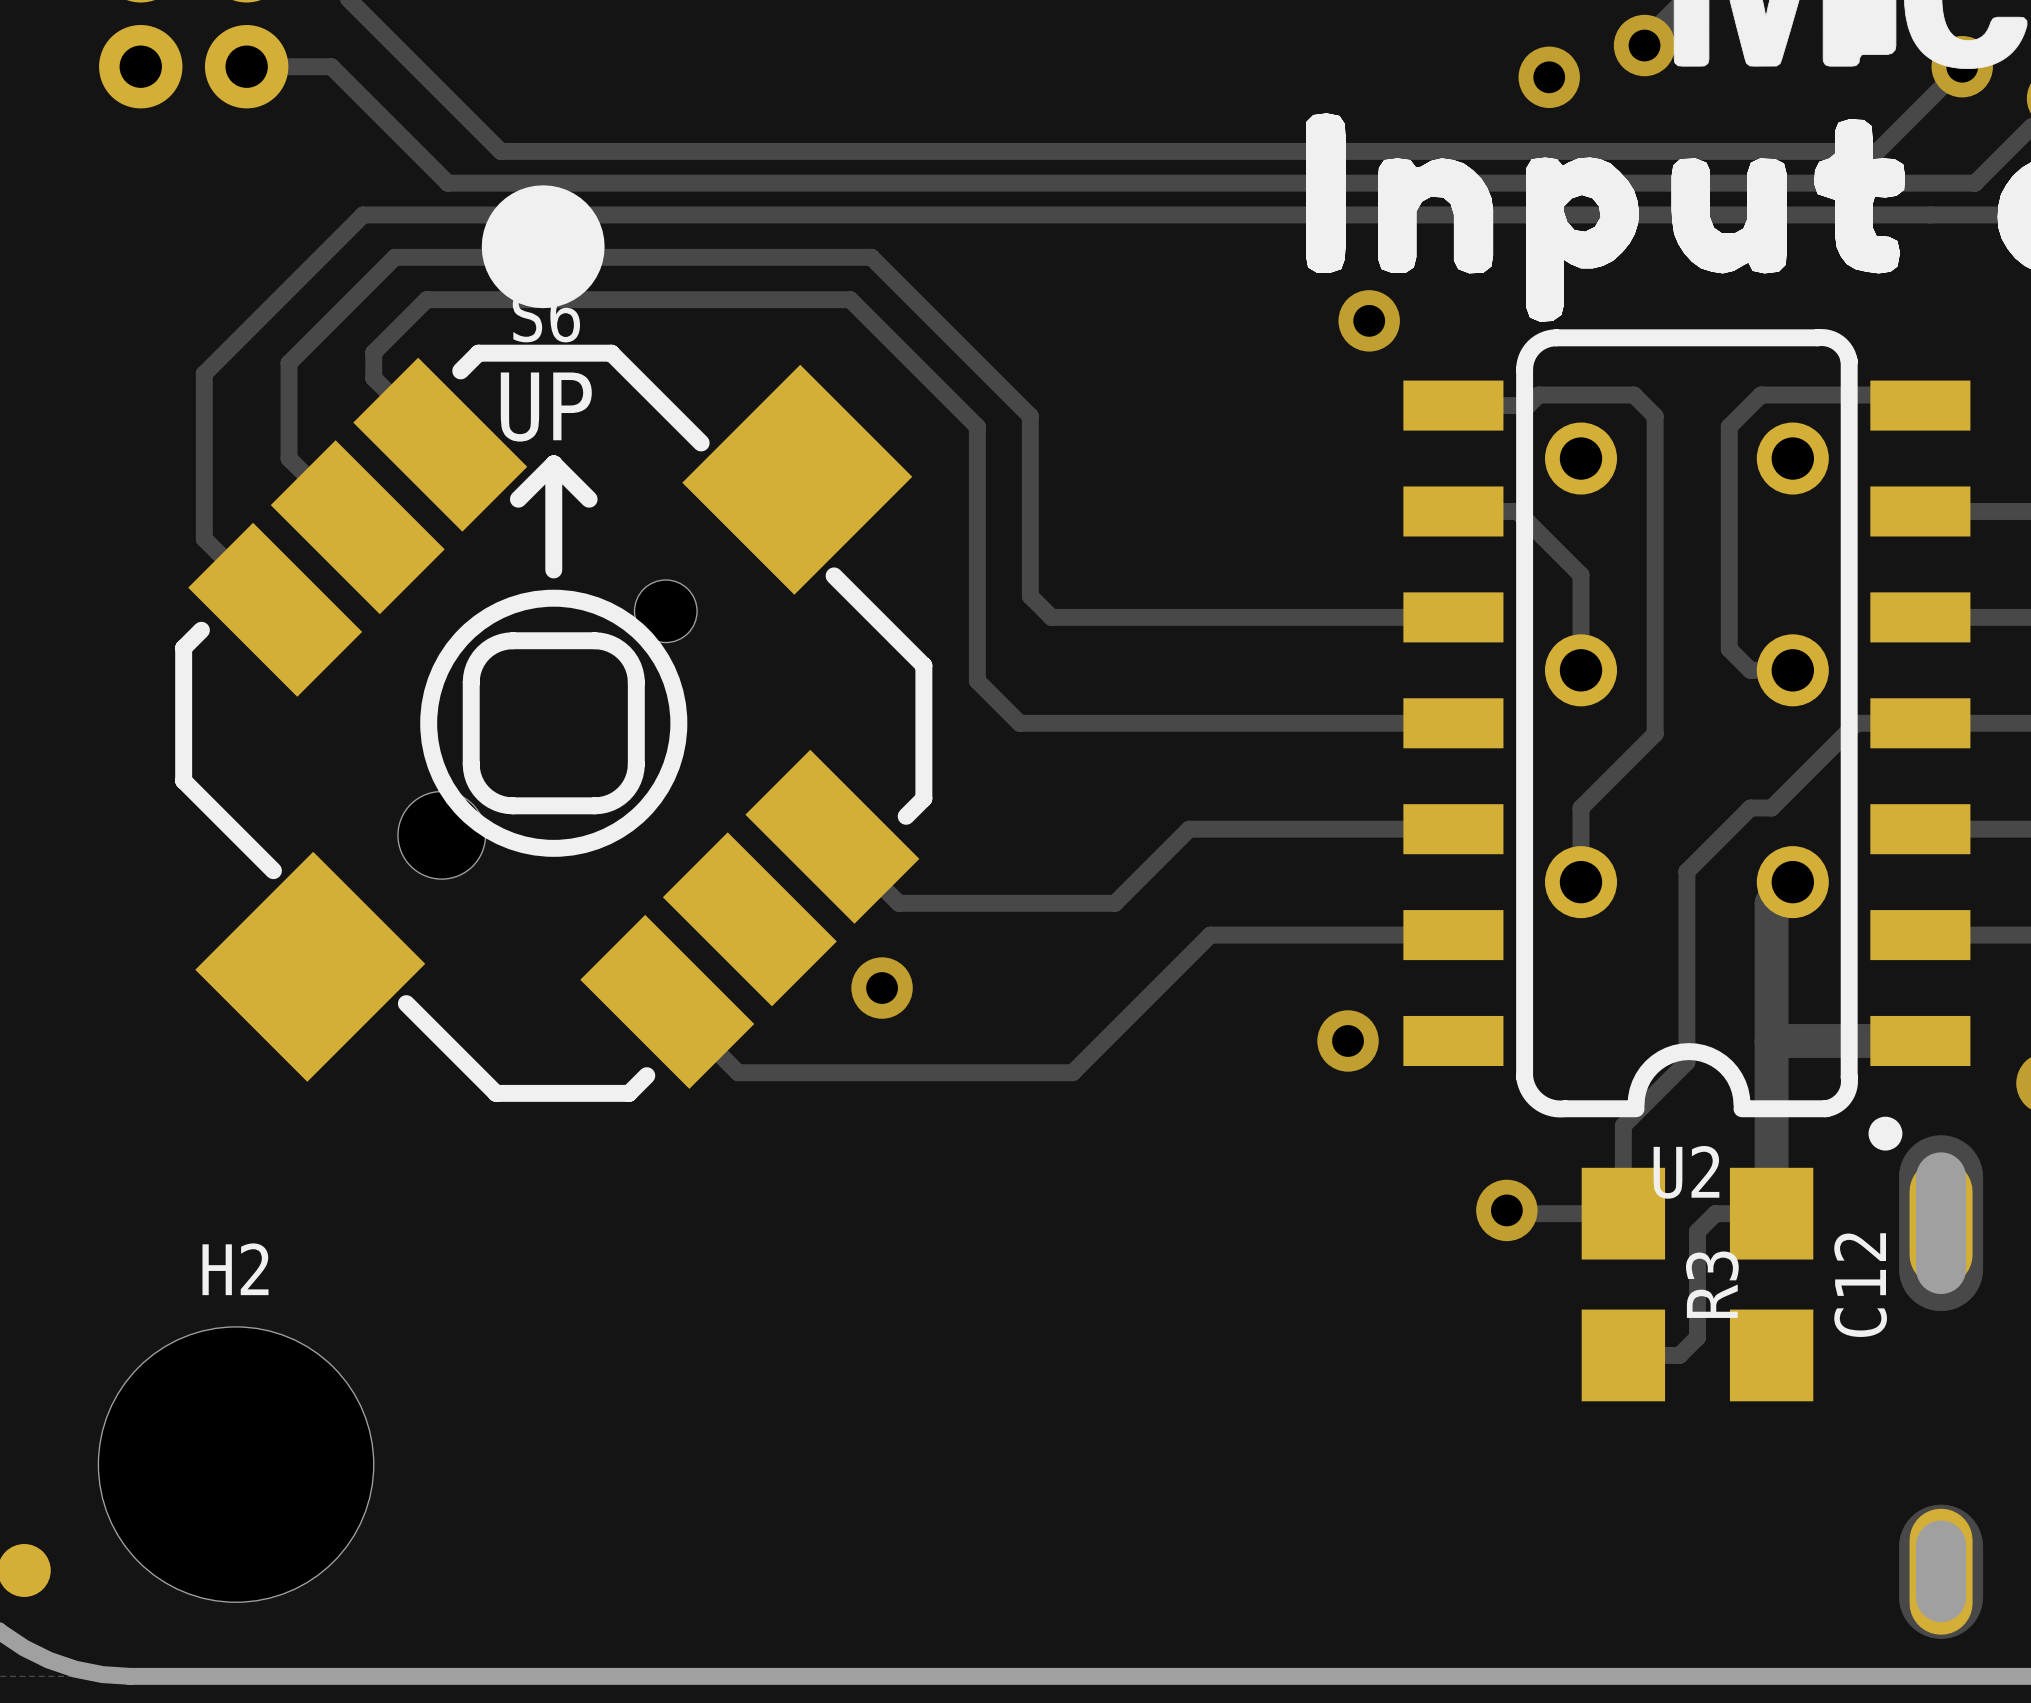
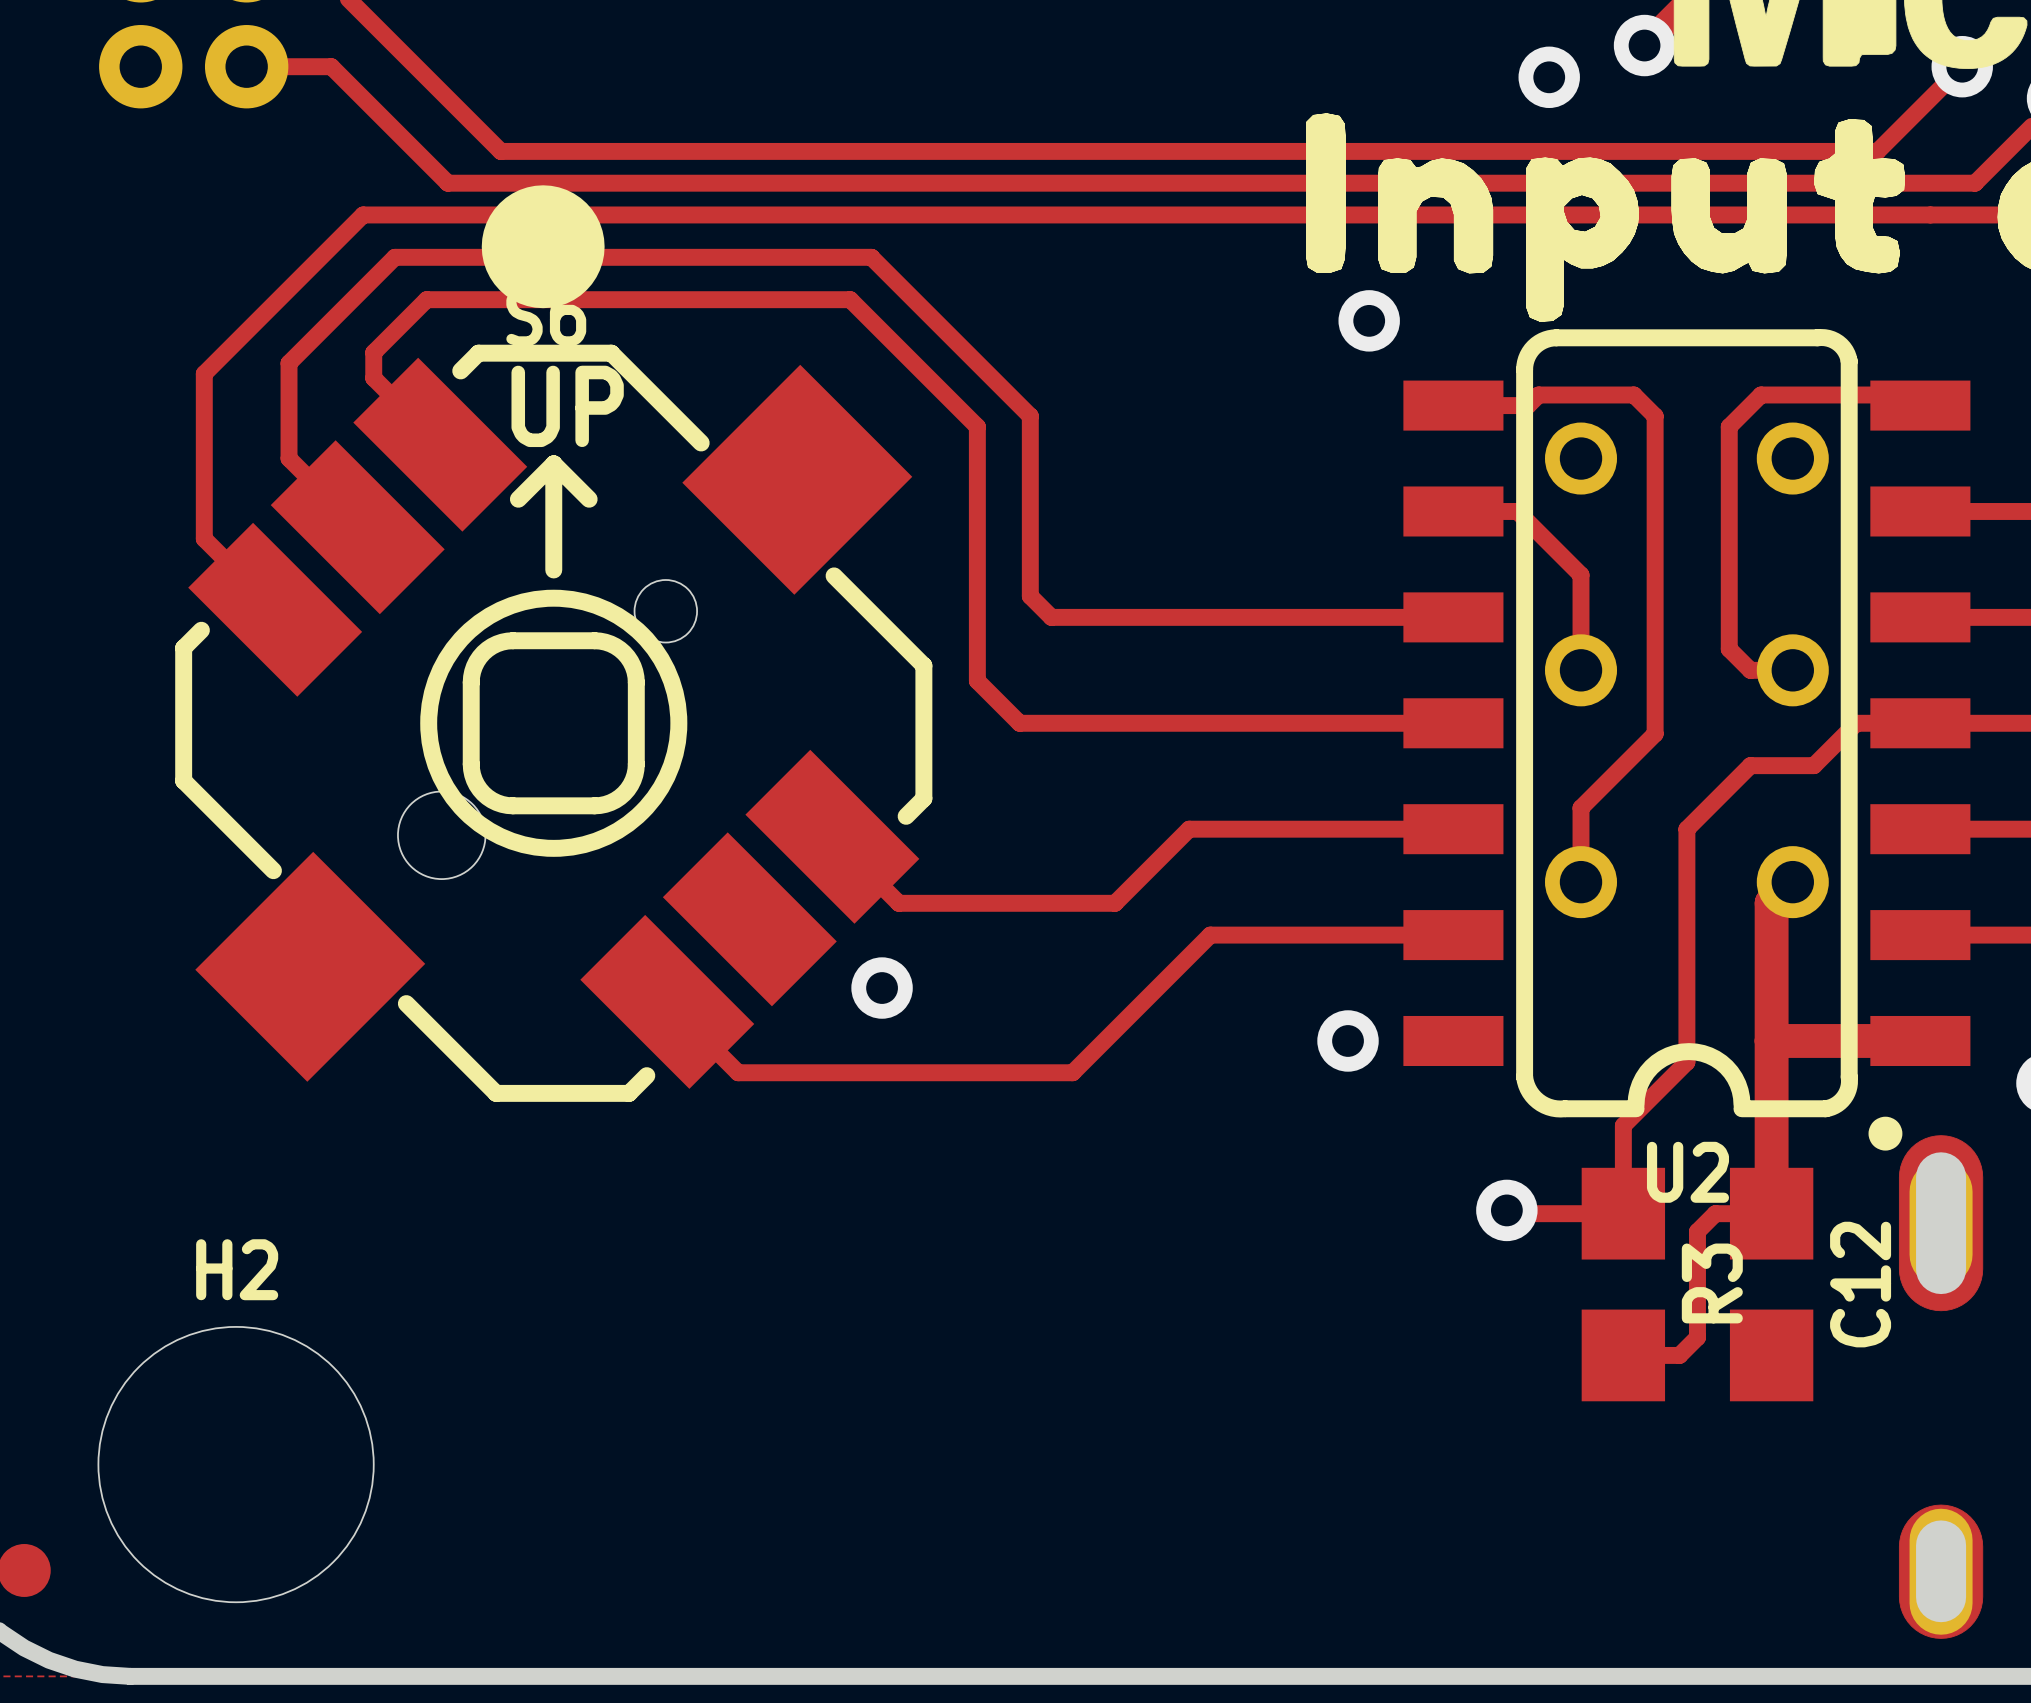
track: (1813, 765) (1771, 808) (1750, 808) (1686, 871) -> (1813, 765) (1750, 765) (1686, 829) (1686, 871)

